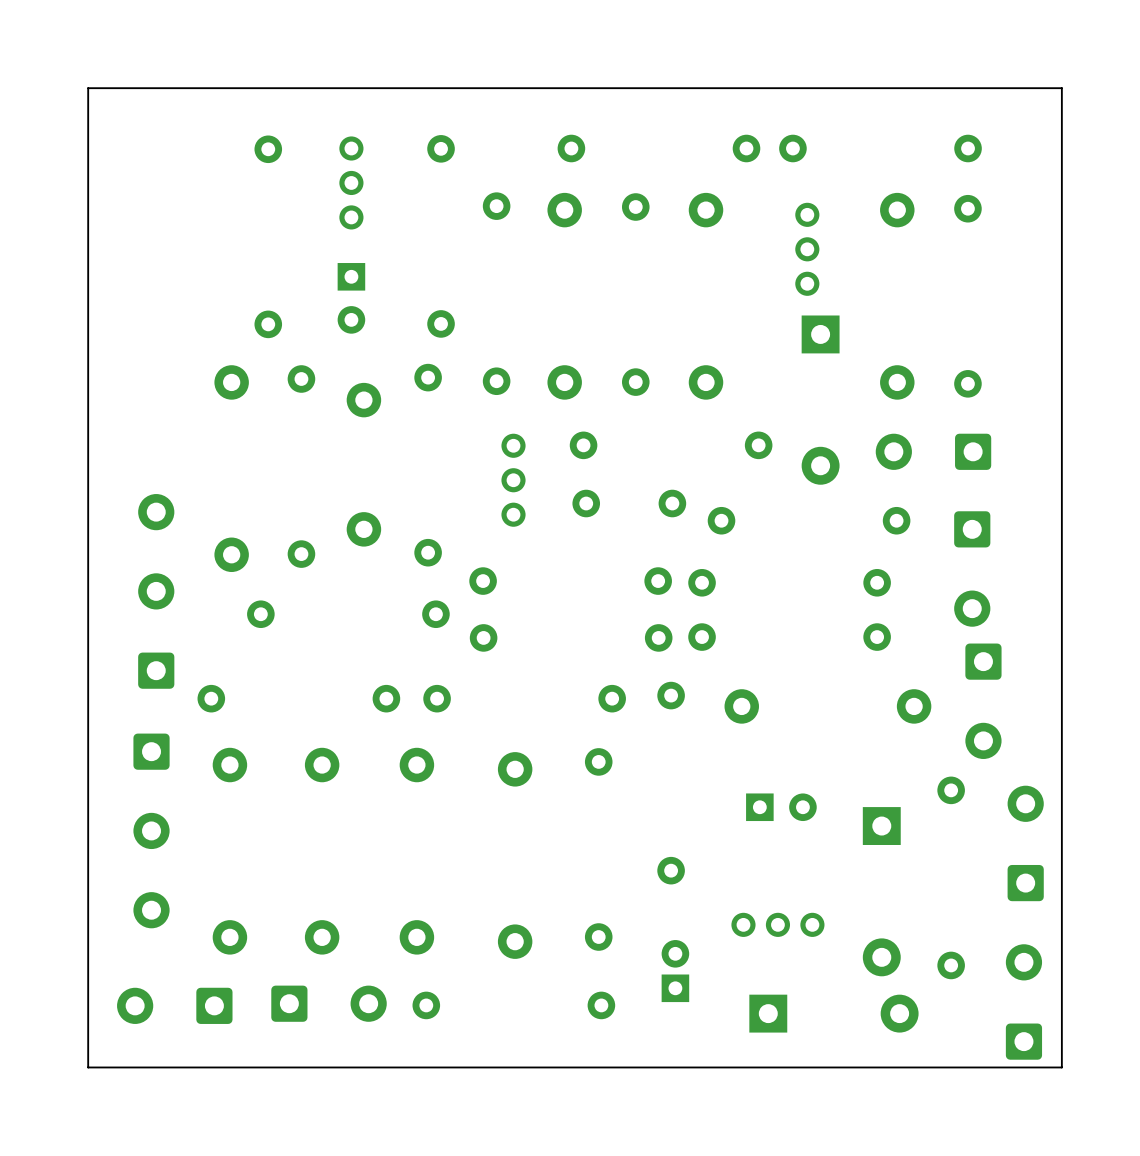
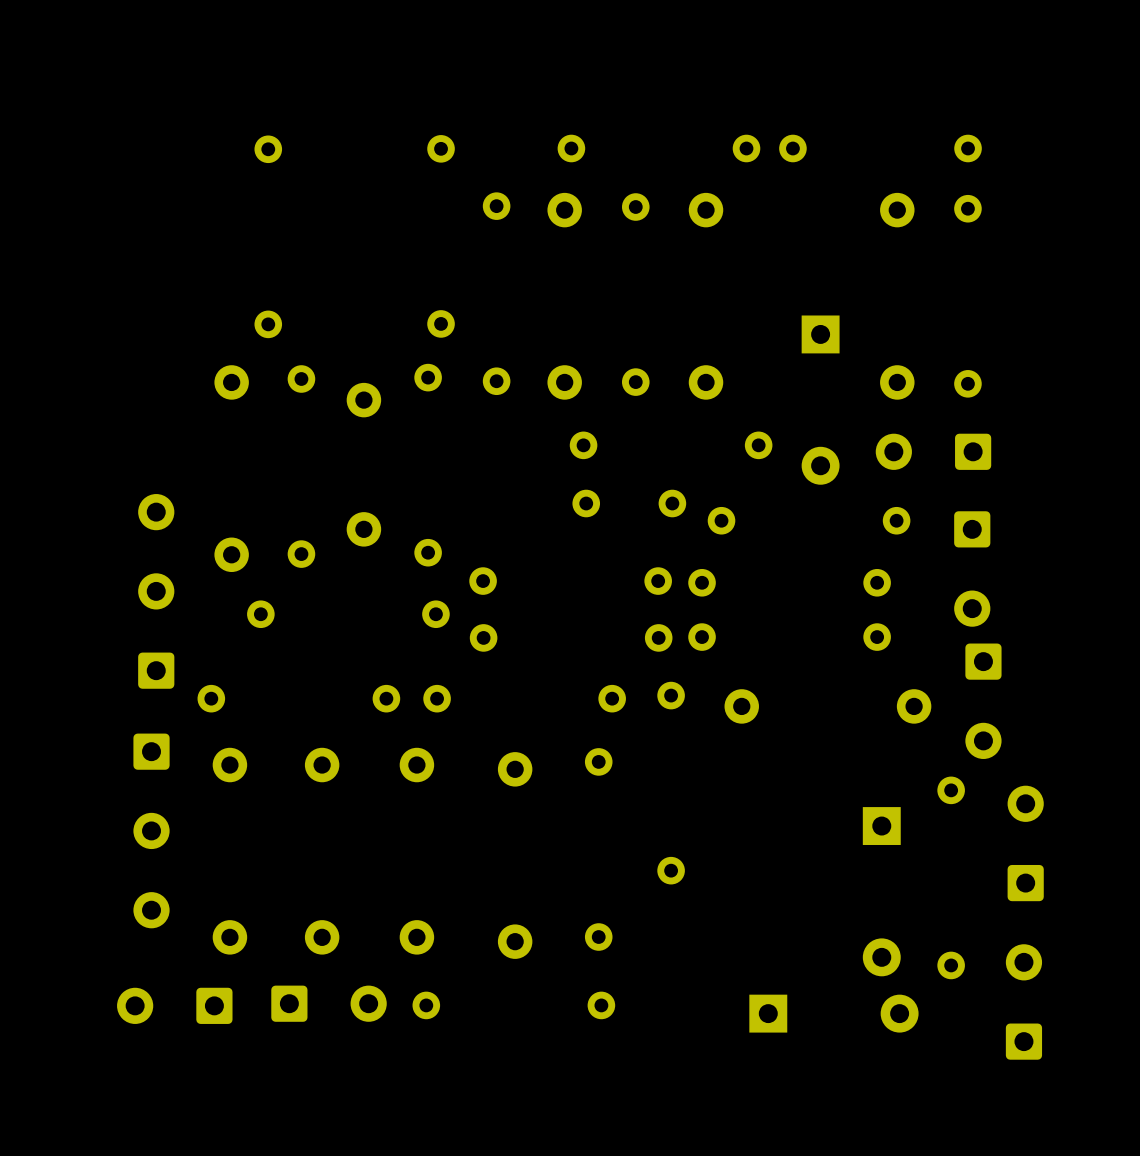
board edge: (1061, 88) (88, 88) (88, 1067) (1061, 1067) (1061, 88) -> none
part: (351, 182) -> none
part: (807, 249) -> none
part: (351, 298) -> none
part: (513, 480) -> none
part: (781, 807) -> none
part: (777, 924) -> none
part: (675, 971) -> none

